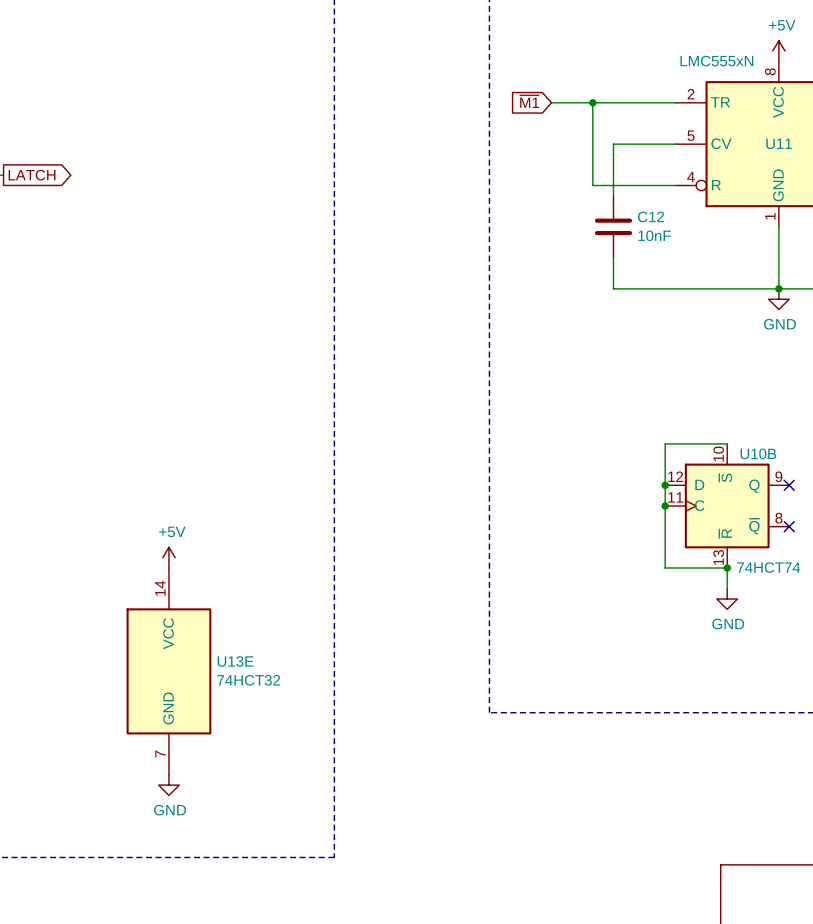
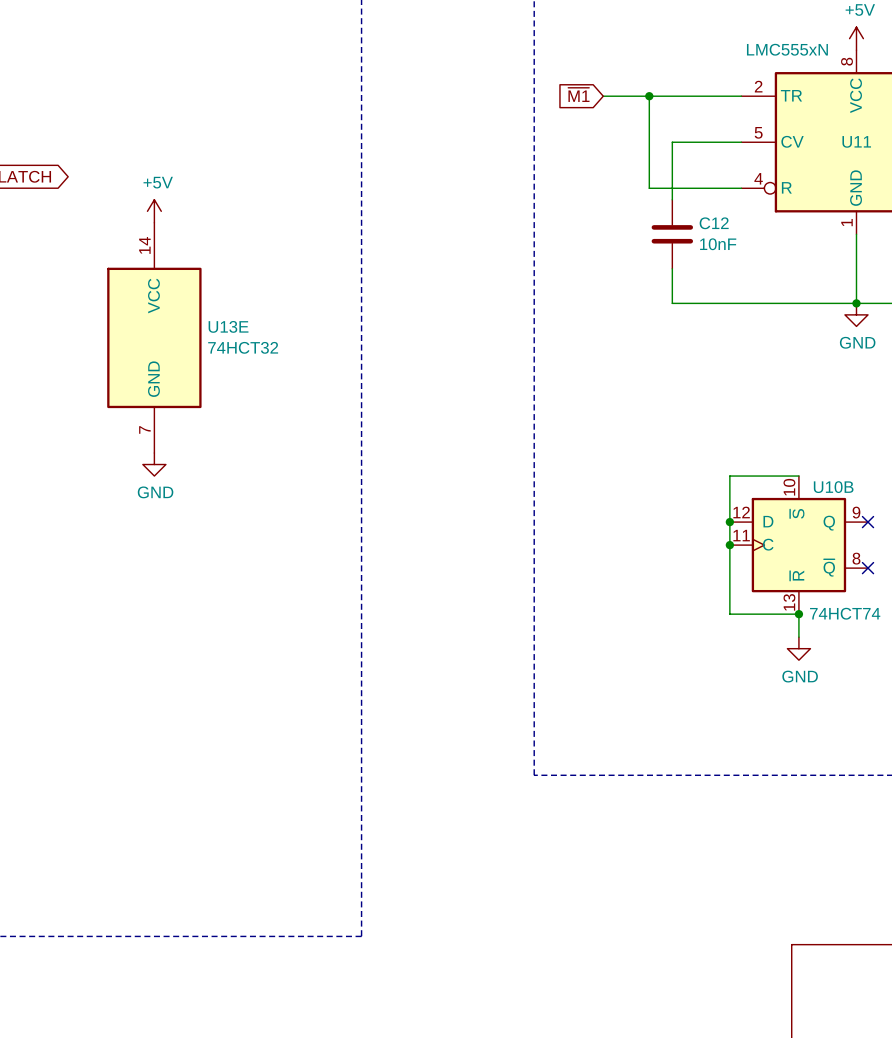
power symbol: none -> +5V (154, 211)
power symbol: none -> GND (154, 464)
power symbol: +5V (168, 557) -> none
U13E position: (168, 671) -> (154, 337)
power symbol: GND (168, 785) -> none

